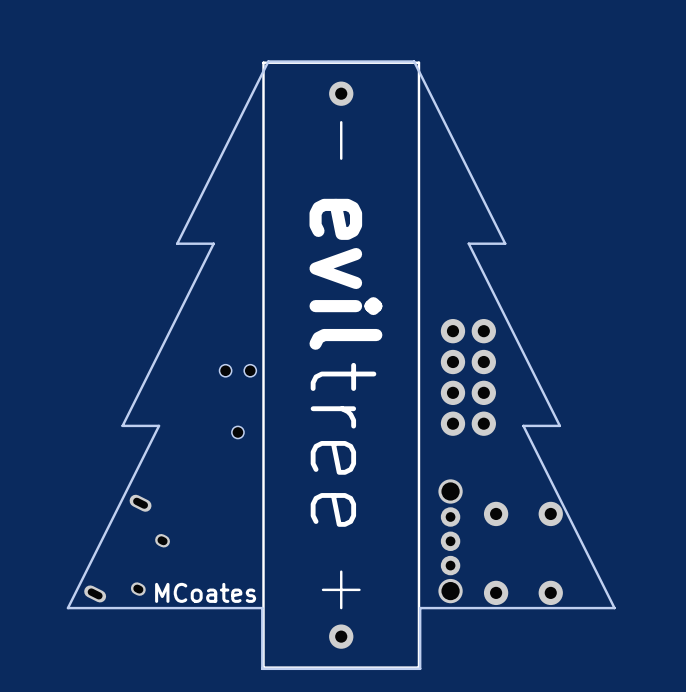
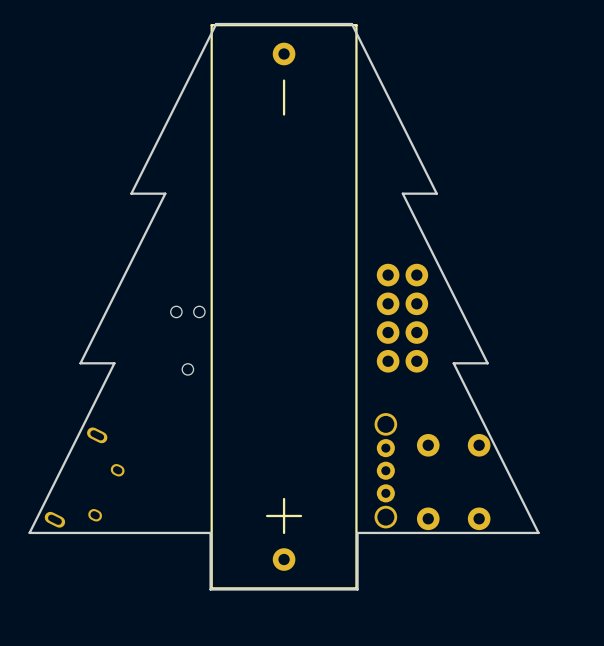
text: evil (345, 274) -> none
text: tree (343, 444) -> none
text: MCoates (205, 592) -> none

